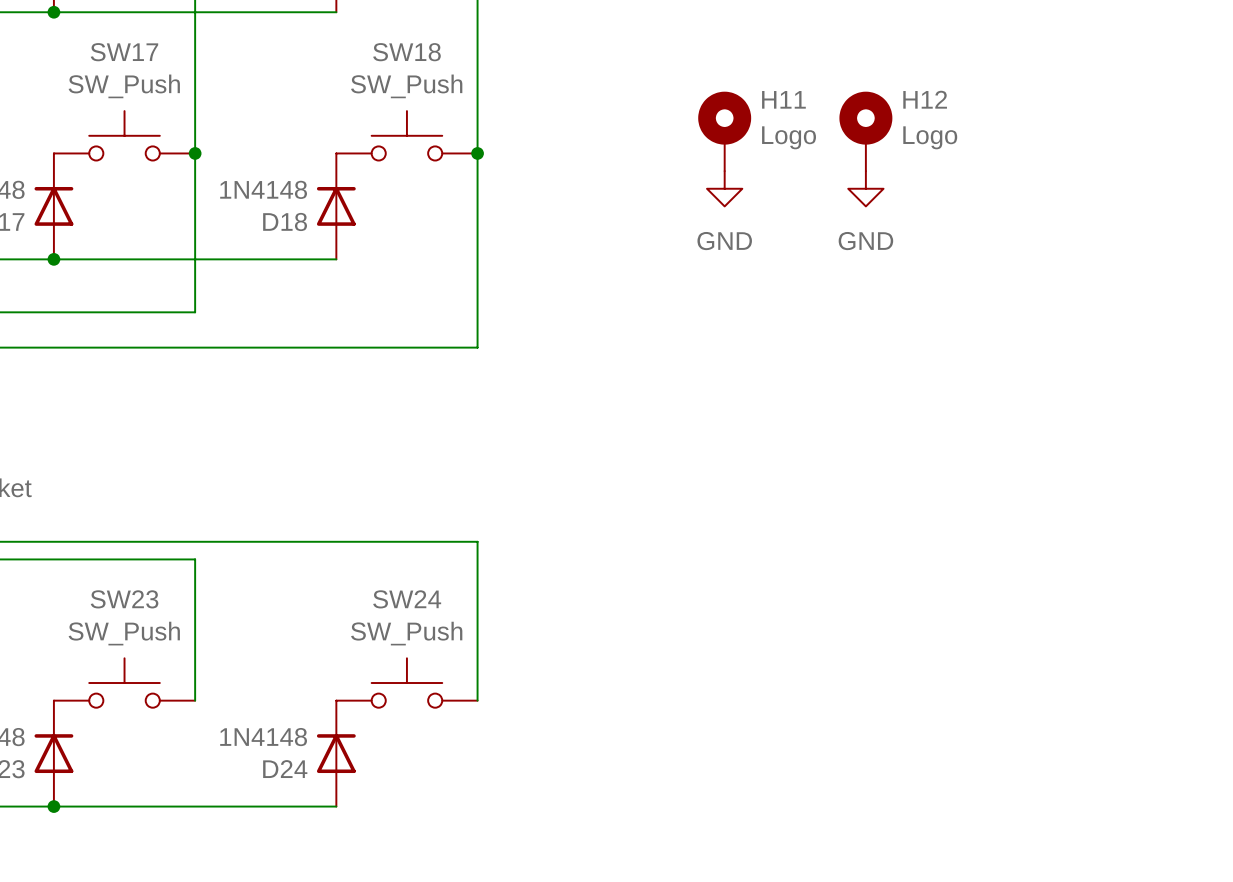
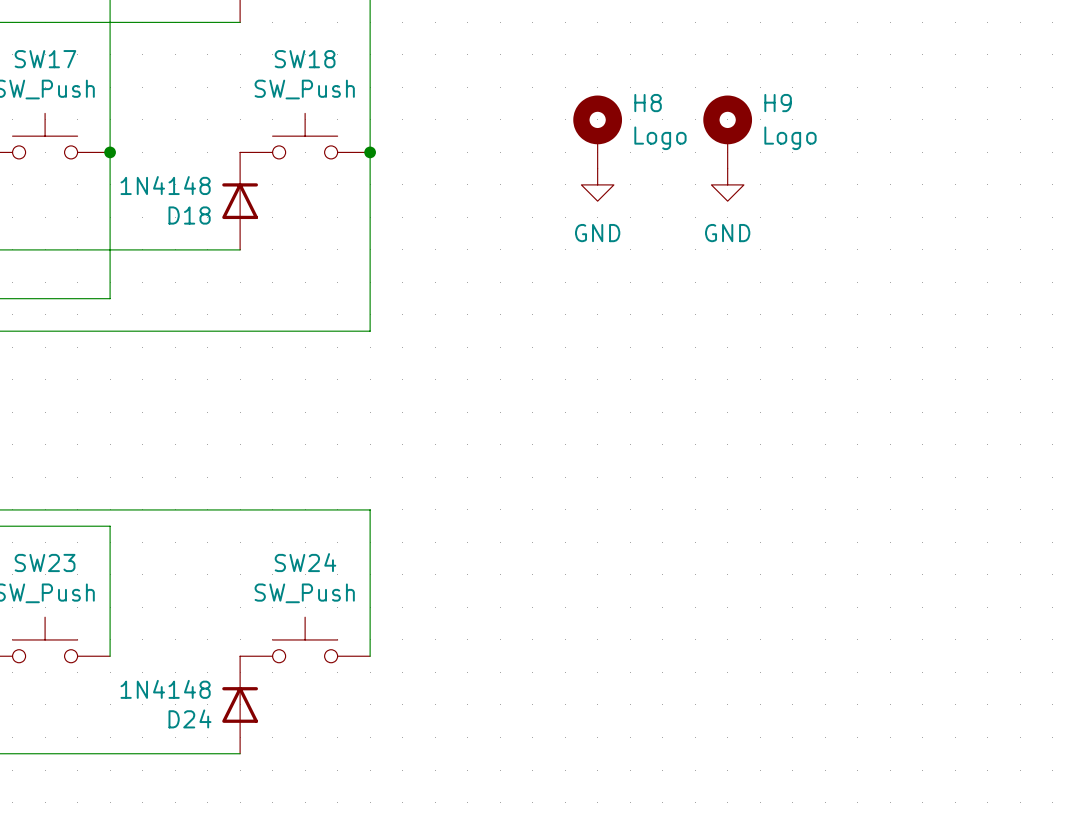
H11 name: H11 (783, 99) -> H8 (648, 103)
H12 name: H12 (925, 99) -> H9 (778, 103)

